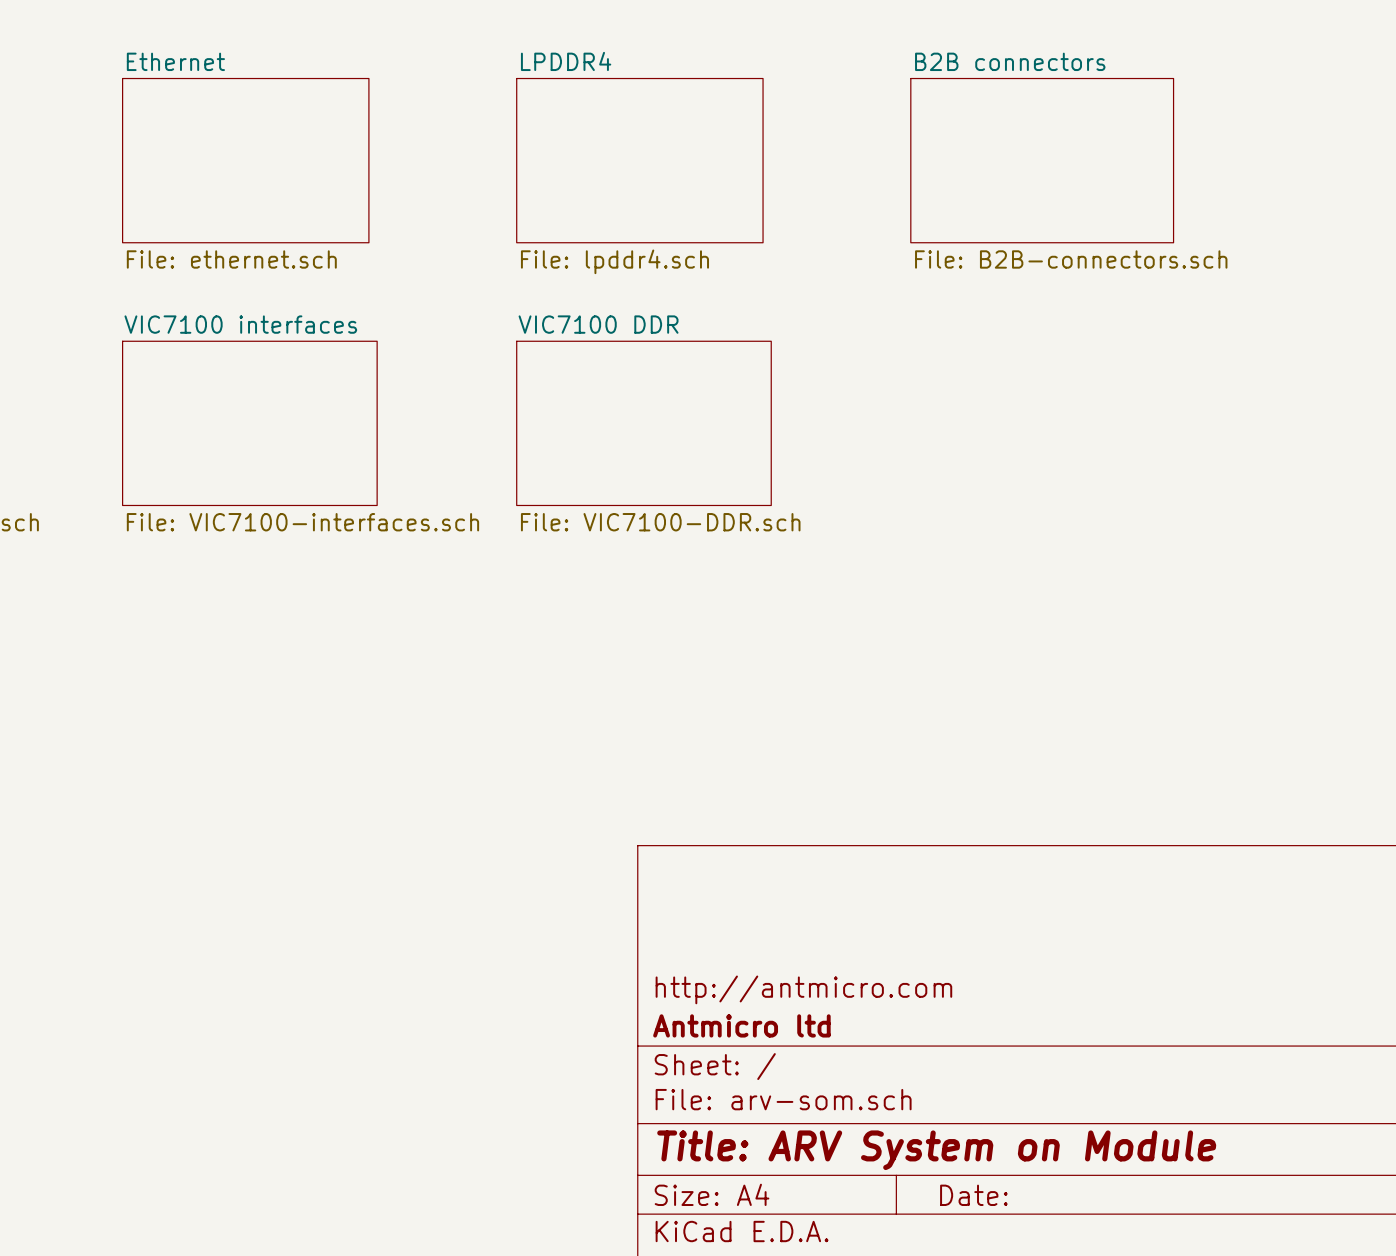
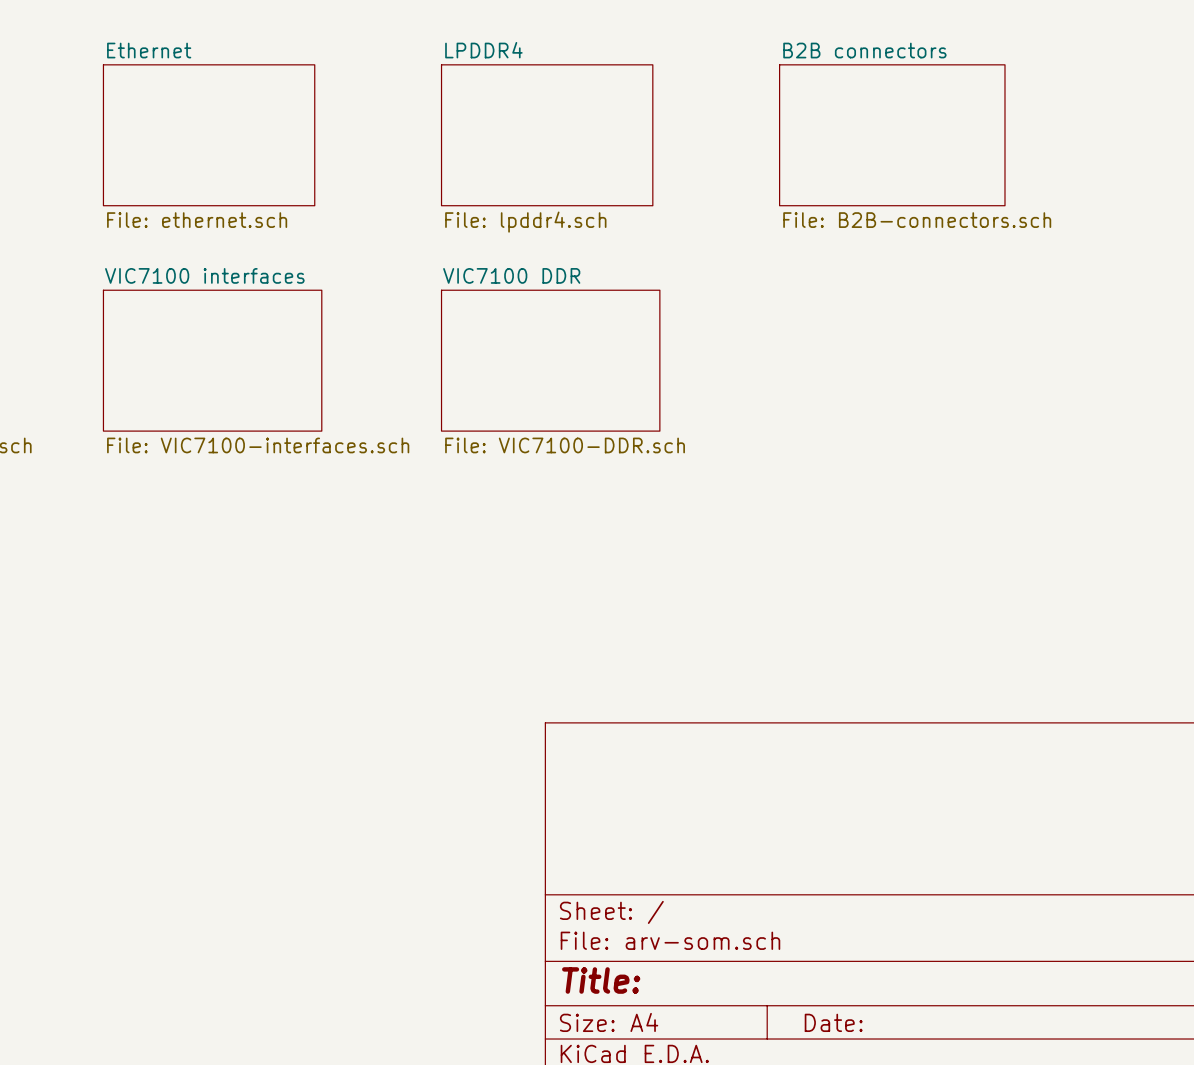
title block: http://antmicro.com (803, 989) -> none
title block: Antmicro ltd (741, 1025) -> none
title block: Title: ARV System on Module (936, 1150) -> Title: (601, 980)

